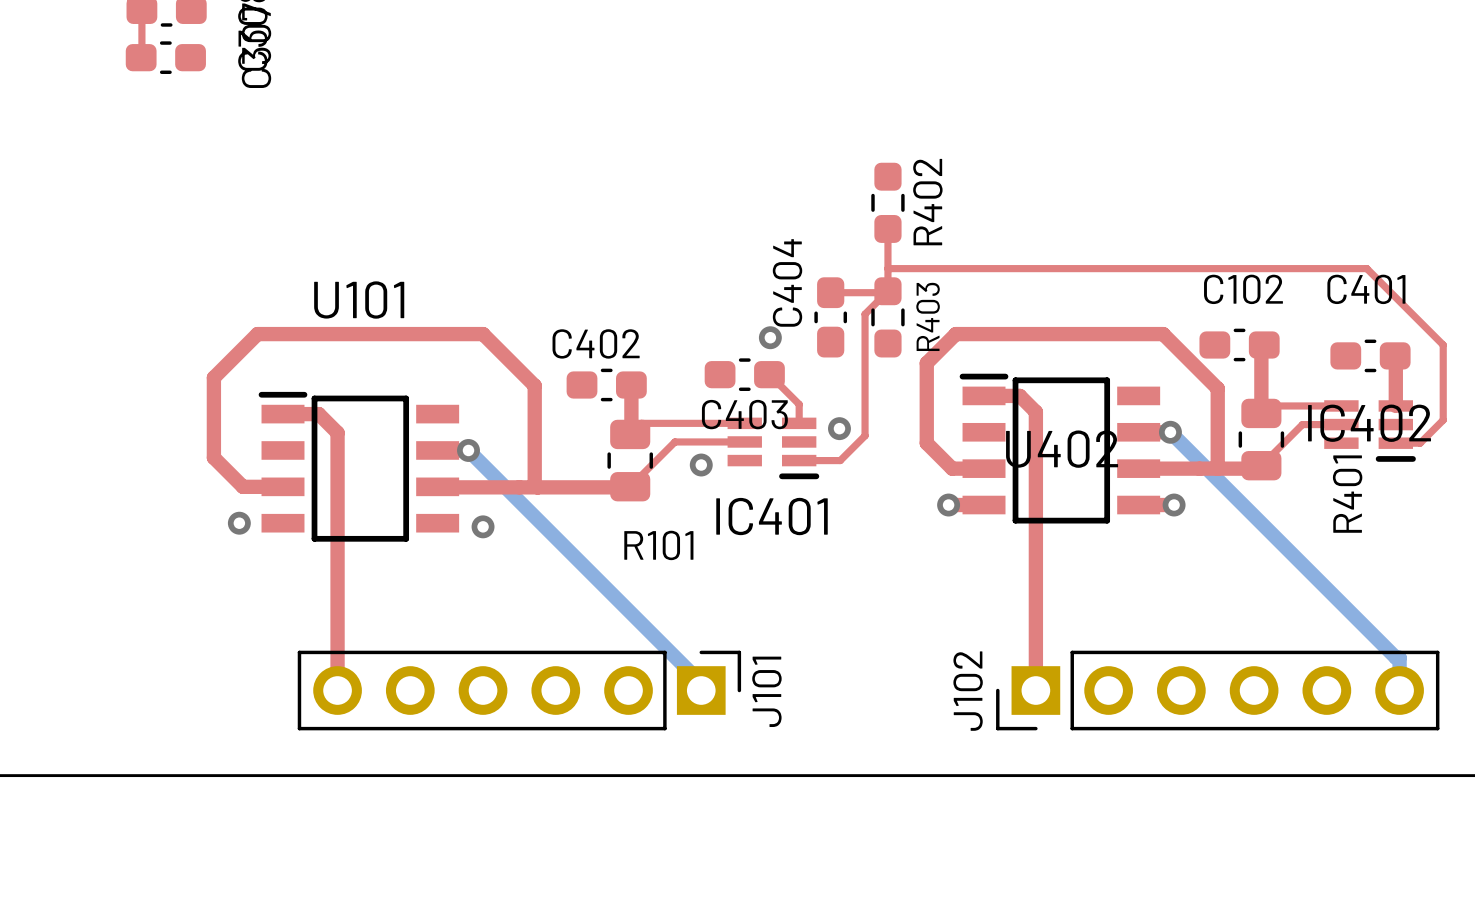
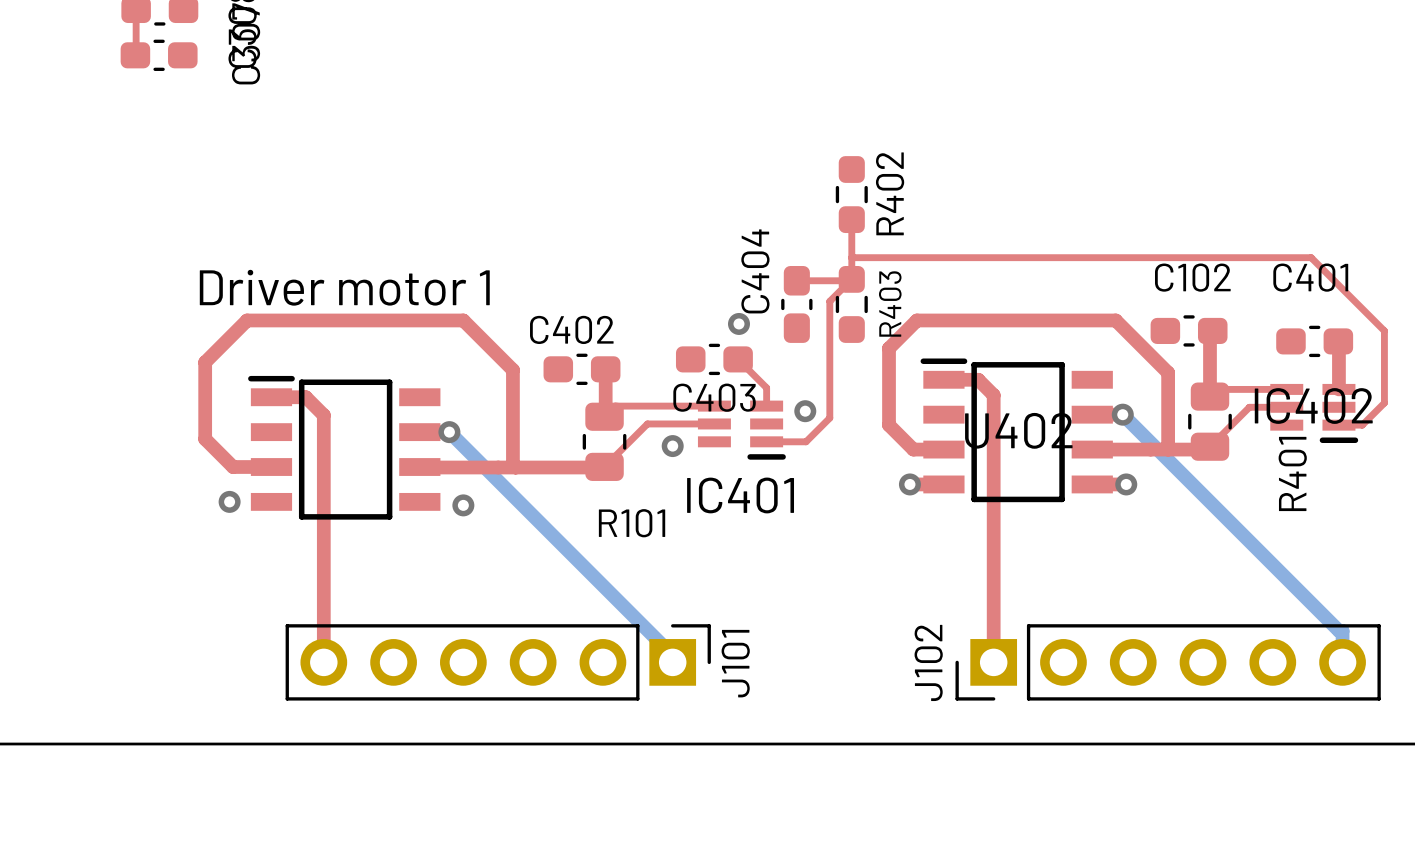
U101 name: U101 (359, 300) -> Driver motor 1 (344, 287)

